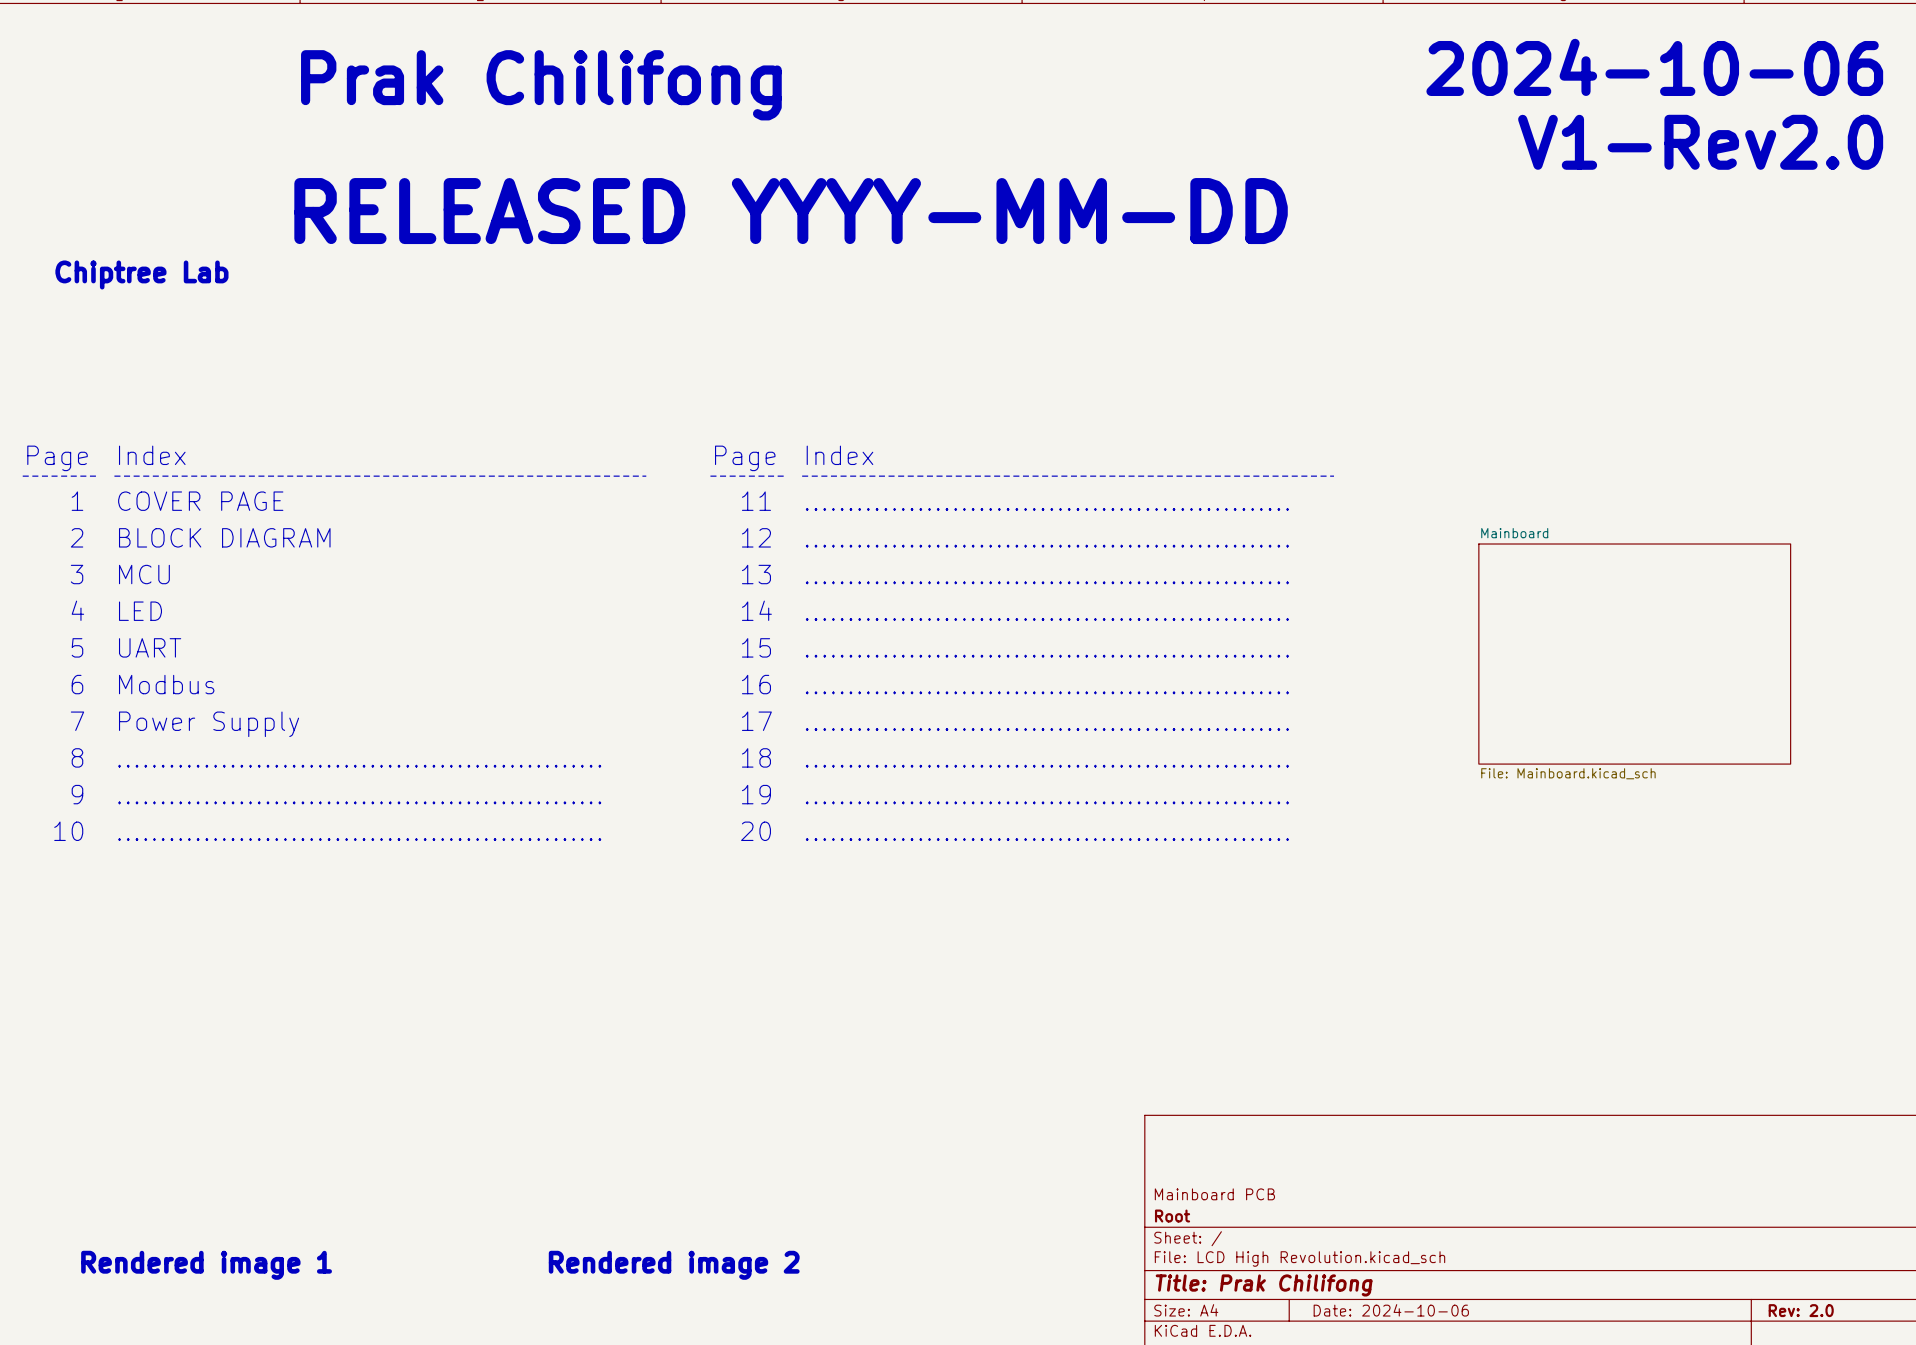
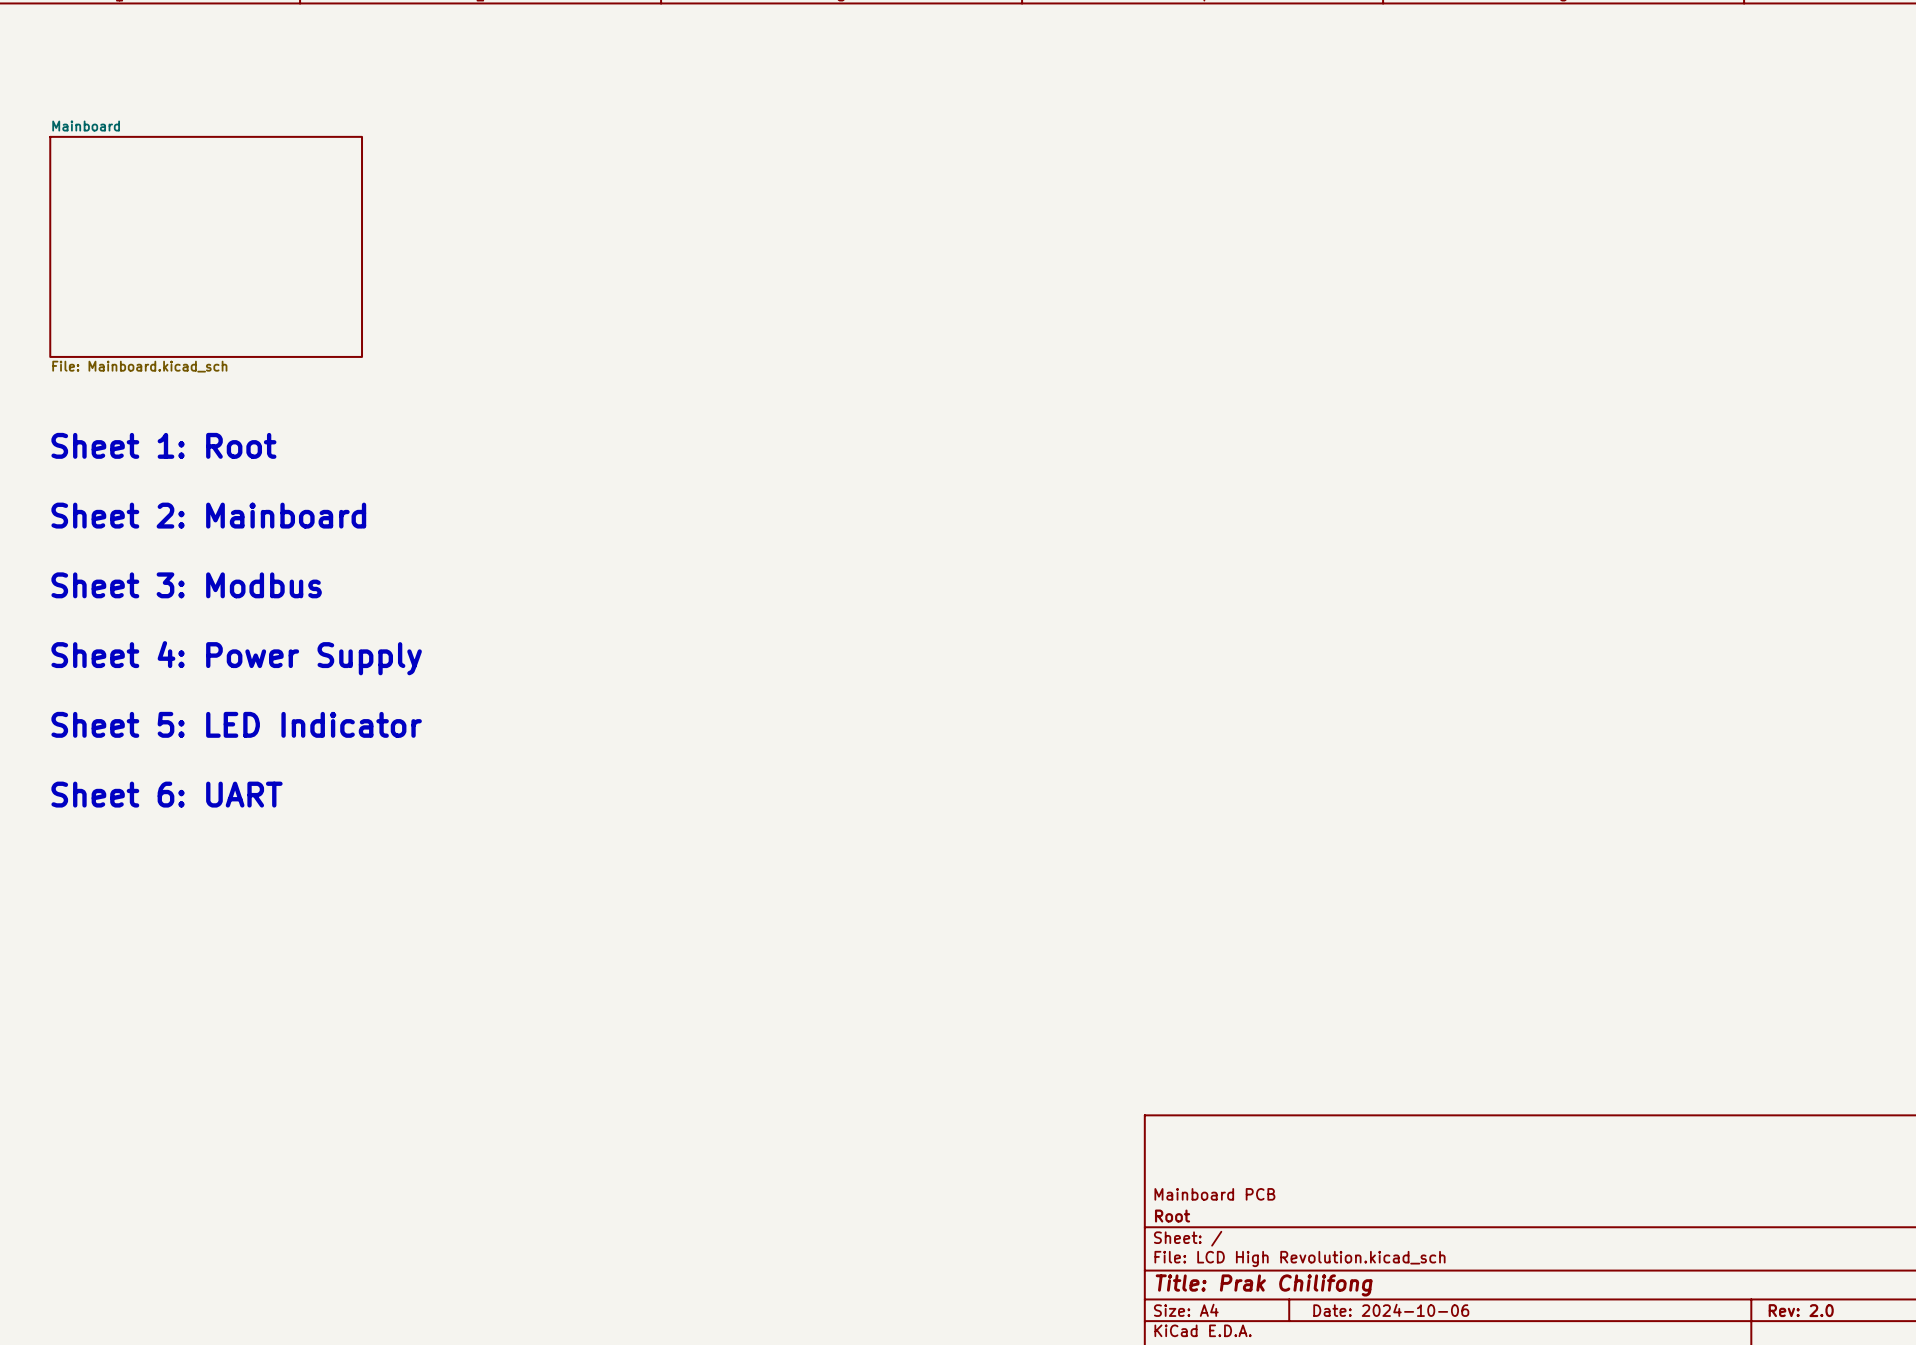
text: 2024-10-06 (1654, 67) -> none
text: Prak Chilifong (541, 85) -> none
text: V1-Rev2.0 (1700, 142) -> none
text: RELEASED YYYY-MM-DD (791, 211) -> none
sheet Mainboard: none -> File: Mainboard.kicad_sch (206, 246)
text: Chiptree Lab (141, 274) -> none
text: none -> Sheet 1: Root (163, 445)
text: Index (152, 455) -> none
text: Index (839, 455) -> none
text: Page (57, 458) -> none
text: Page (745, 458) -> none
line: (22, 476) (96, 476) -> none
line: (114, 476) (646, 476) -> none
line: (710, 476) (783, 476) -> none
line: (802, 476) (1333, 476) -> none
text: 1 (77, 501) -> none
text: COVER PAGE (200, 501) -> none
text: 11 (756, 501) -> none
text: ........................................................ (1047, 509) -> none
text: none -> Sheet 2: Mainboard (208, 515)
text: 2 (77, 537) -> none
text: BLOCK DIAGRAM (224, 537) -> none
text: 12 (756, 537) -> none
text: ........................................................ (1047, 546) -> none
text: 3 (77, 574) -> none
text: MCU (144, 574) -> none
text: 13 (756, 574) -> none
text: ........................................................ (1047, 582) -> none
text: none -> Sheet 3: Modbus (186, 585)
text: 4 (77, 610) -> none
text: 14 (756, 610) -> none
text: LED (140, 611) -> none
text: ........................................................ (1047, 619) -> none
text: 5 (77, 647) -> none
text: UART (150, 647) -> none
text: 15 (756, 647) -> none
sheet Mainboard: File: Mainboard.kicad_sch (1634, 654) -> none
text: ........................................................ (1047, 656) -> none
text: none -> Sheet 4: Power Supply (236, 658)
text: 6 (77, 684) -> none
text: Modbus (166, 684) -> none
text: 16 (756, 684) -> none
text: ........................................................ (1047, 692) -> none
text: 7 (77, 721) -> none
text: 17 (756, 721) -> none
text: Power Supply (209, 724) -> none
text: none -> Sheet 5: LED Indicator (236, 724)
text: ........................................................ (1047, 729) -> none
text: 8 (77, 757) -> none
text: 18 (756, 757) -> none
text: ........................................................ (359, 766) -> none
text: ........................................................ (1047, 766) -> none
text: 9 (77, 794) -> none
text: none -> Sheet 6: UART (167, 794)
text: 19 (756, 794) -> none
text: ........................................................ (359, 802) -> none
text: ........................................................ (1047, 802) -> none
text: 10 (68, 831) -> none
text: 20 (756, 831) -> none
text: ........................................................ (359, 839) -> none
text: ........................................................ (1047, 839) -> none
text: Rendered image 1 (206, 1265) -> none
text: Rendered image 2 (674, 1265) -> none

